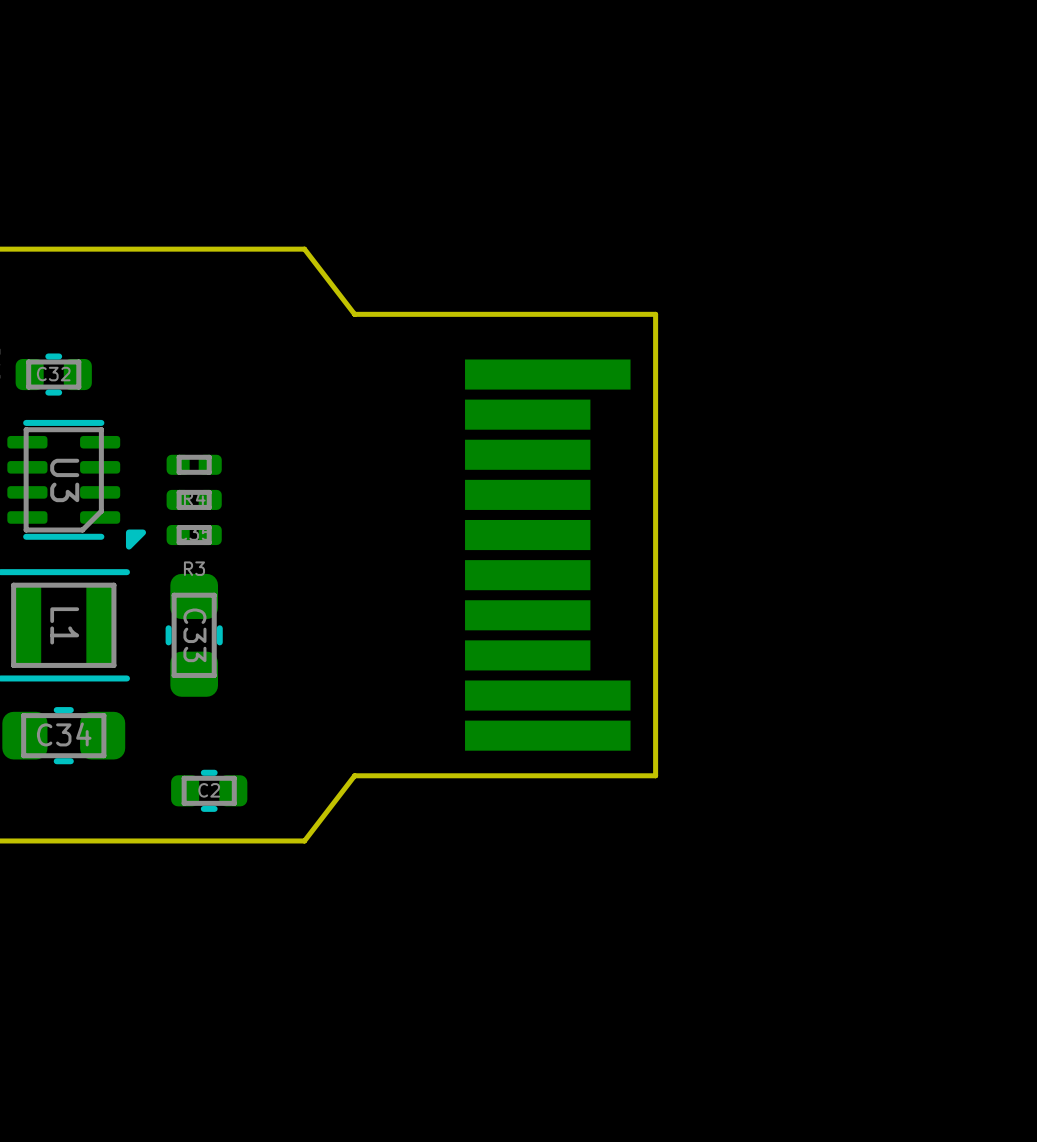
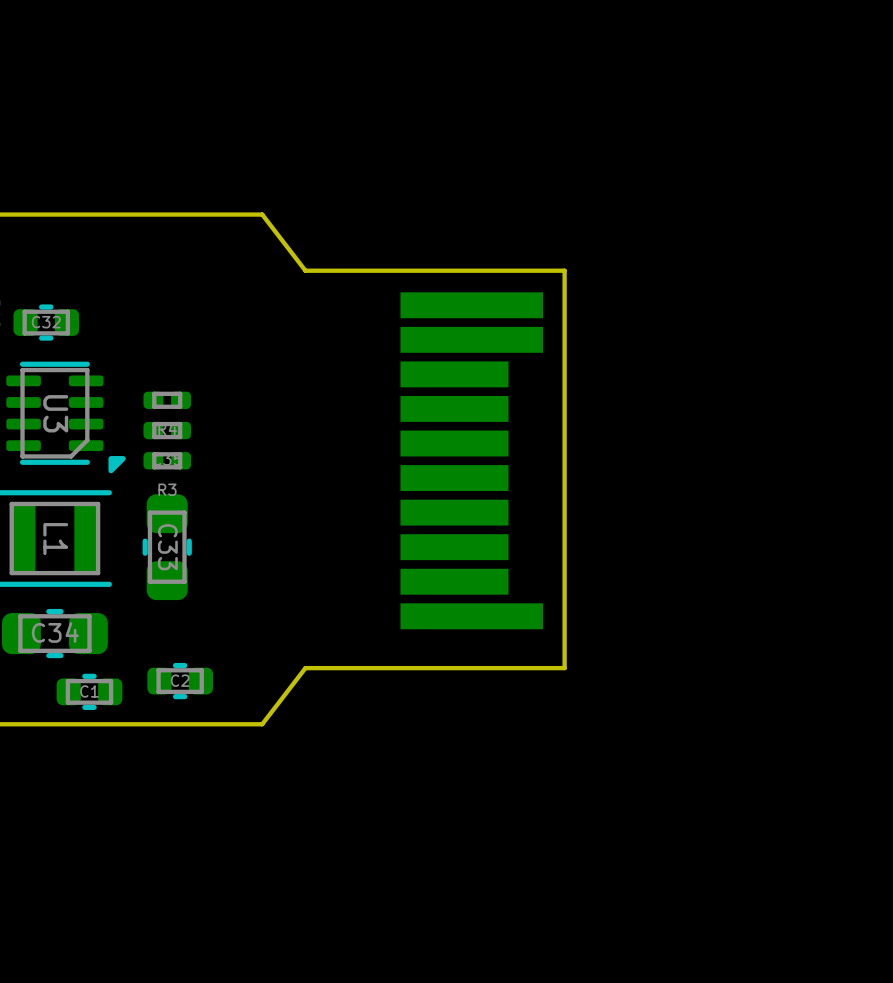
part footprint: [465, 359, 631, 751] -> [400, 292, 544, 630]
C1: none -> (89, 691)

